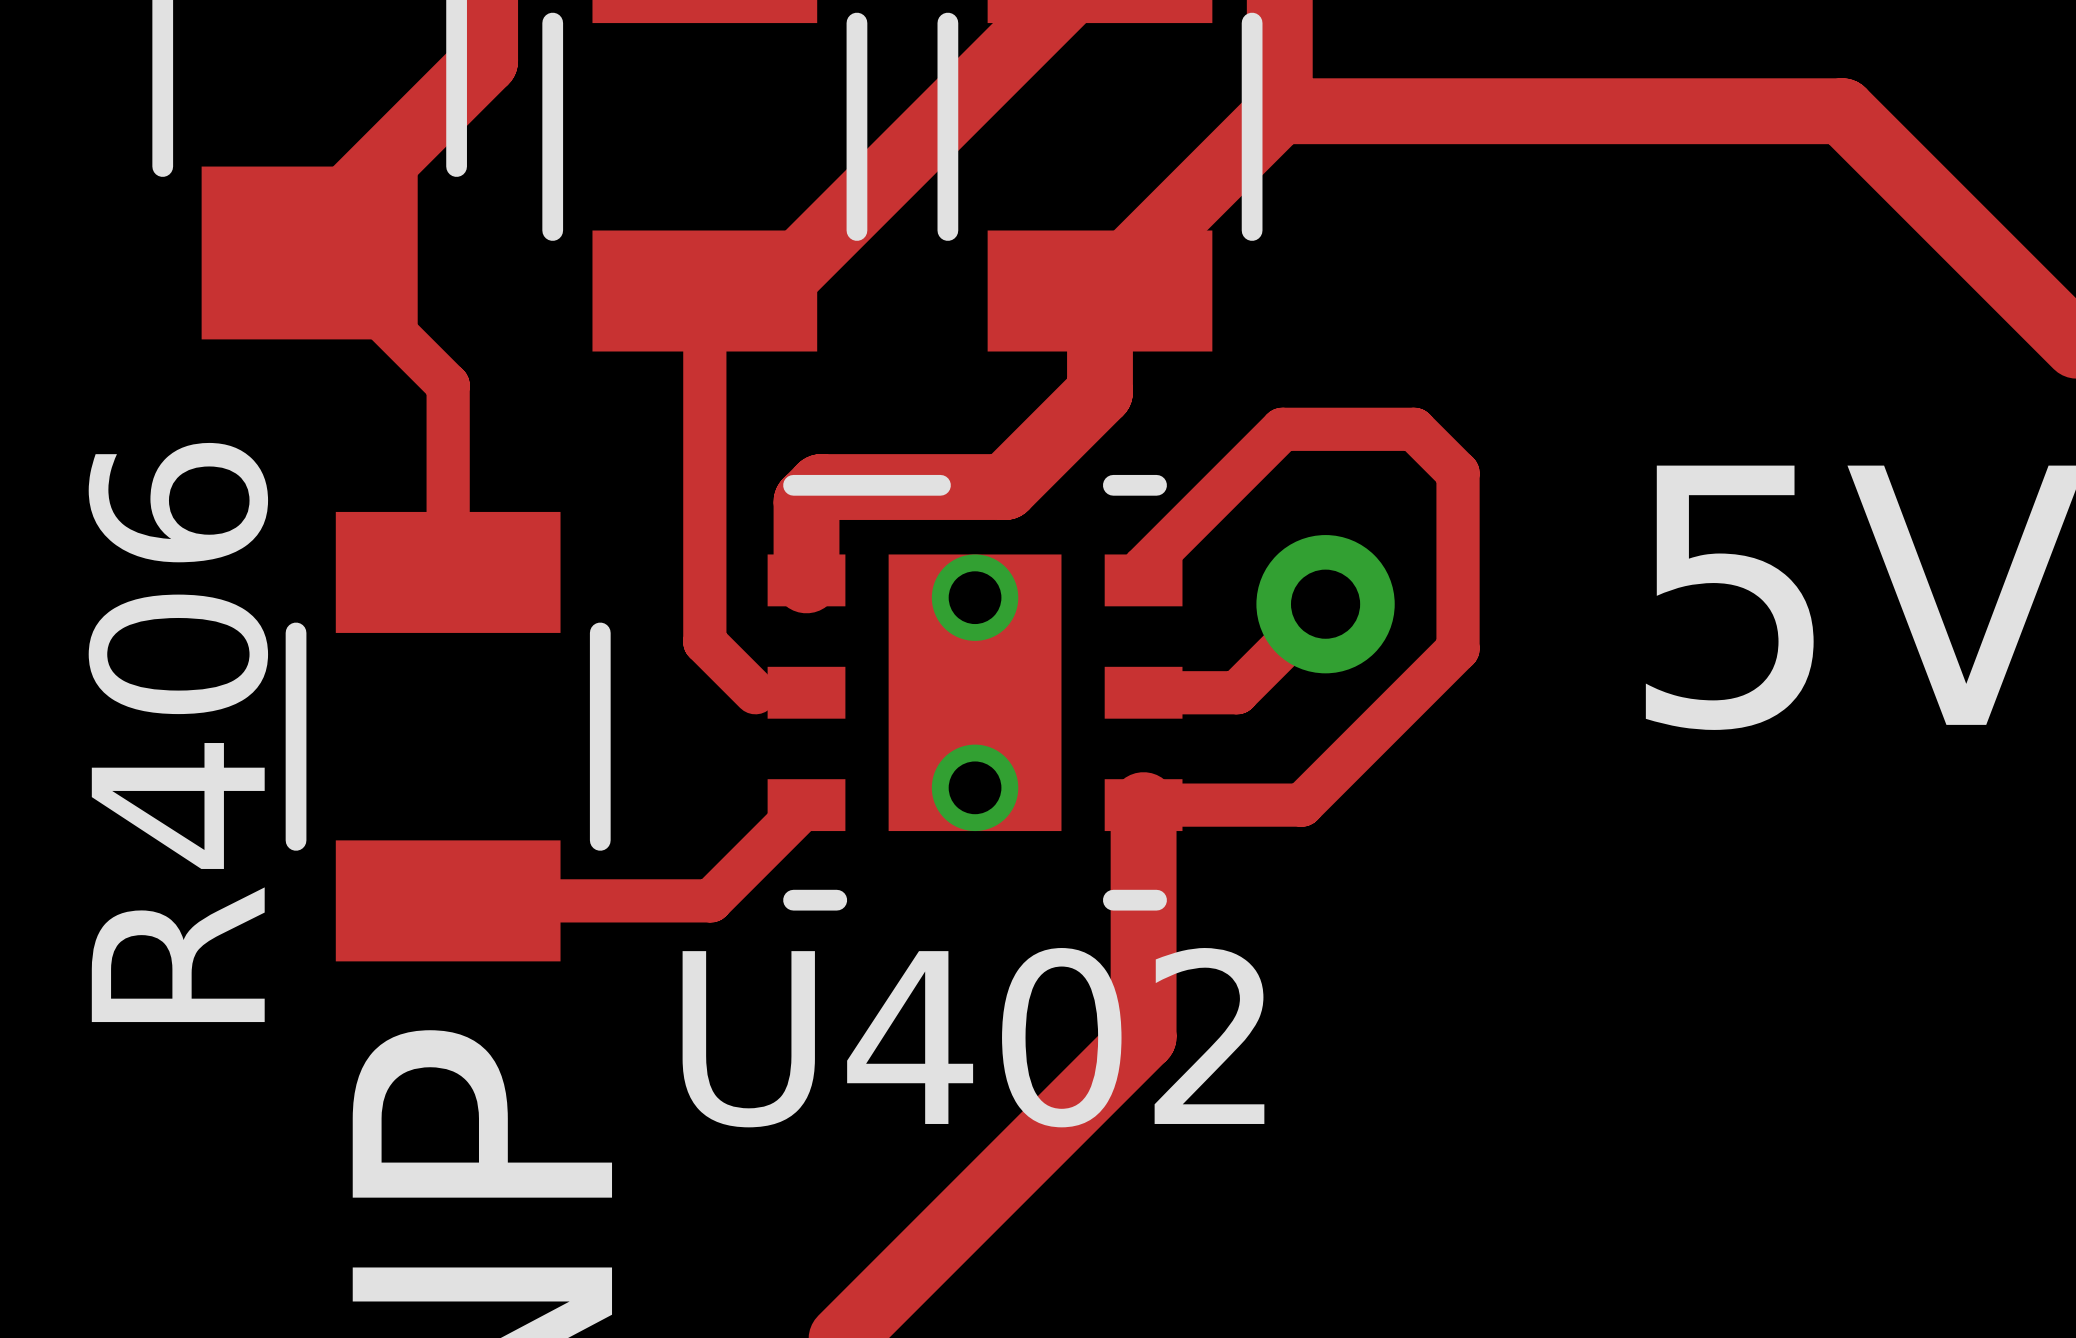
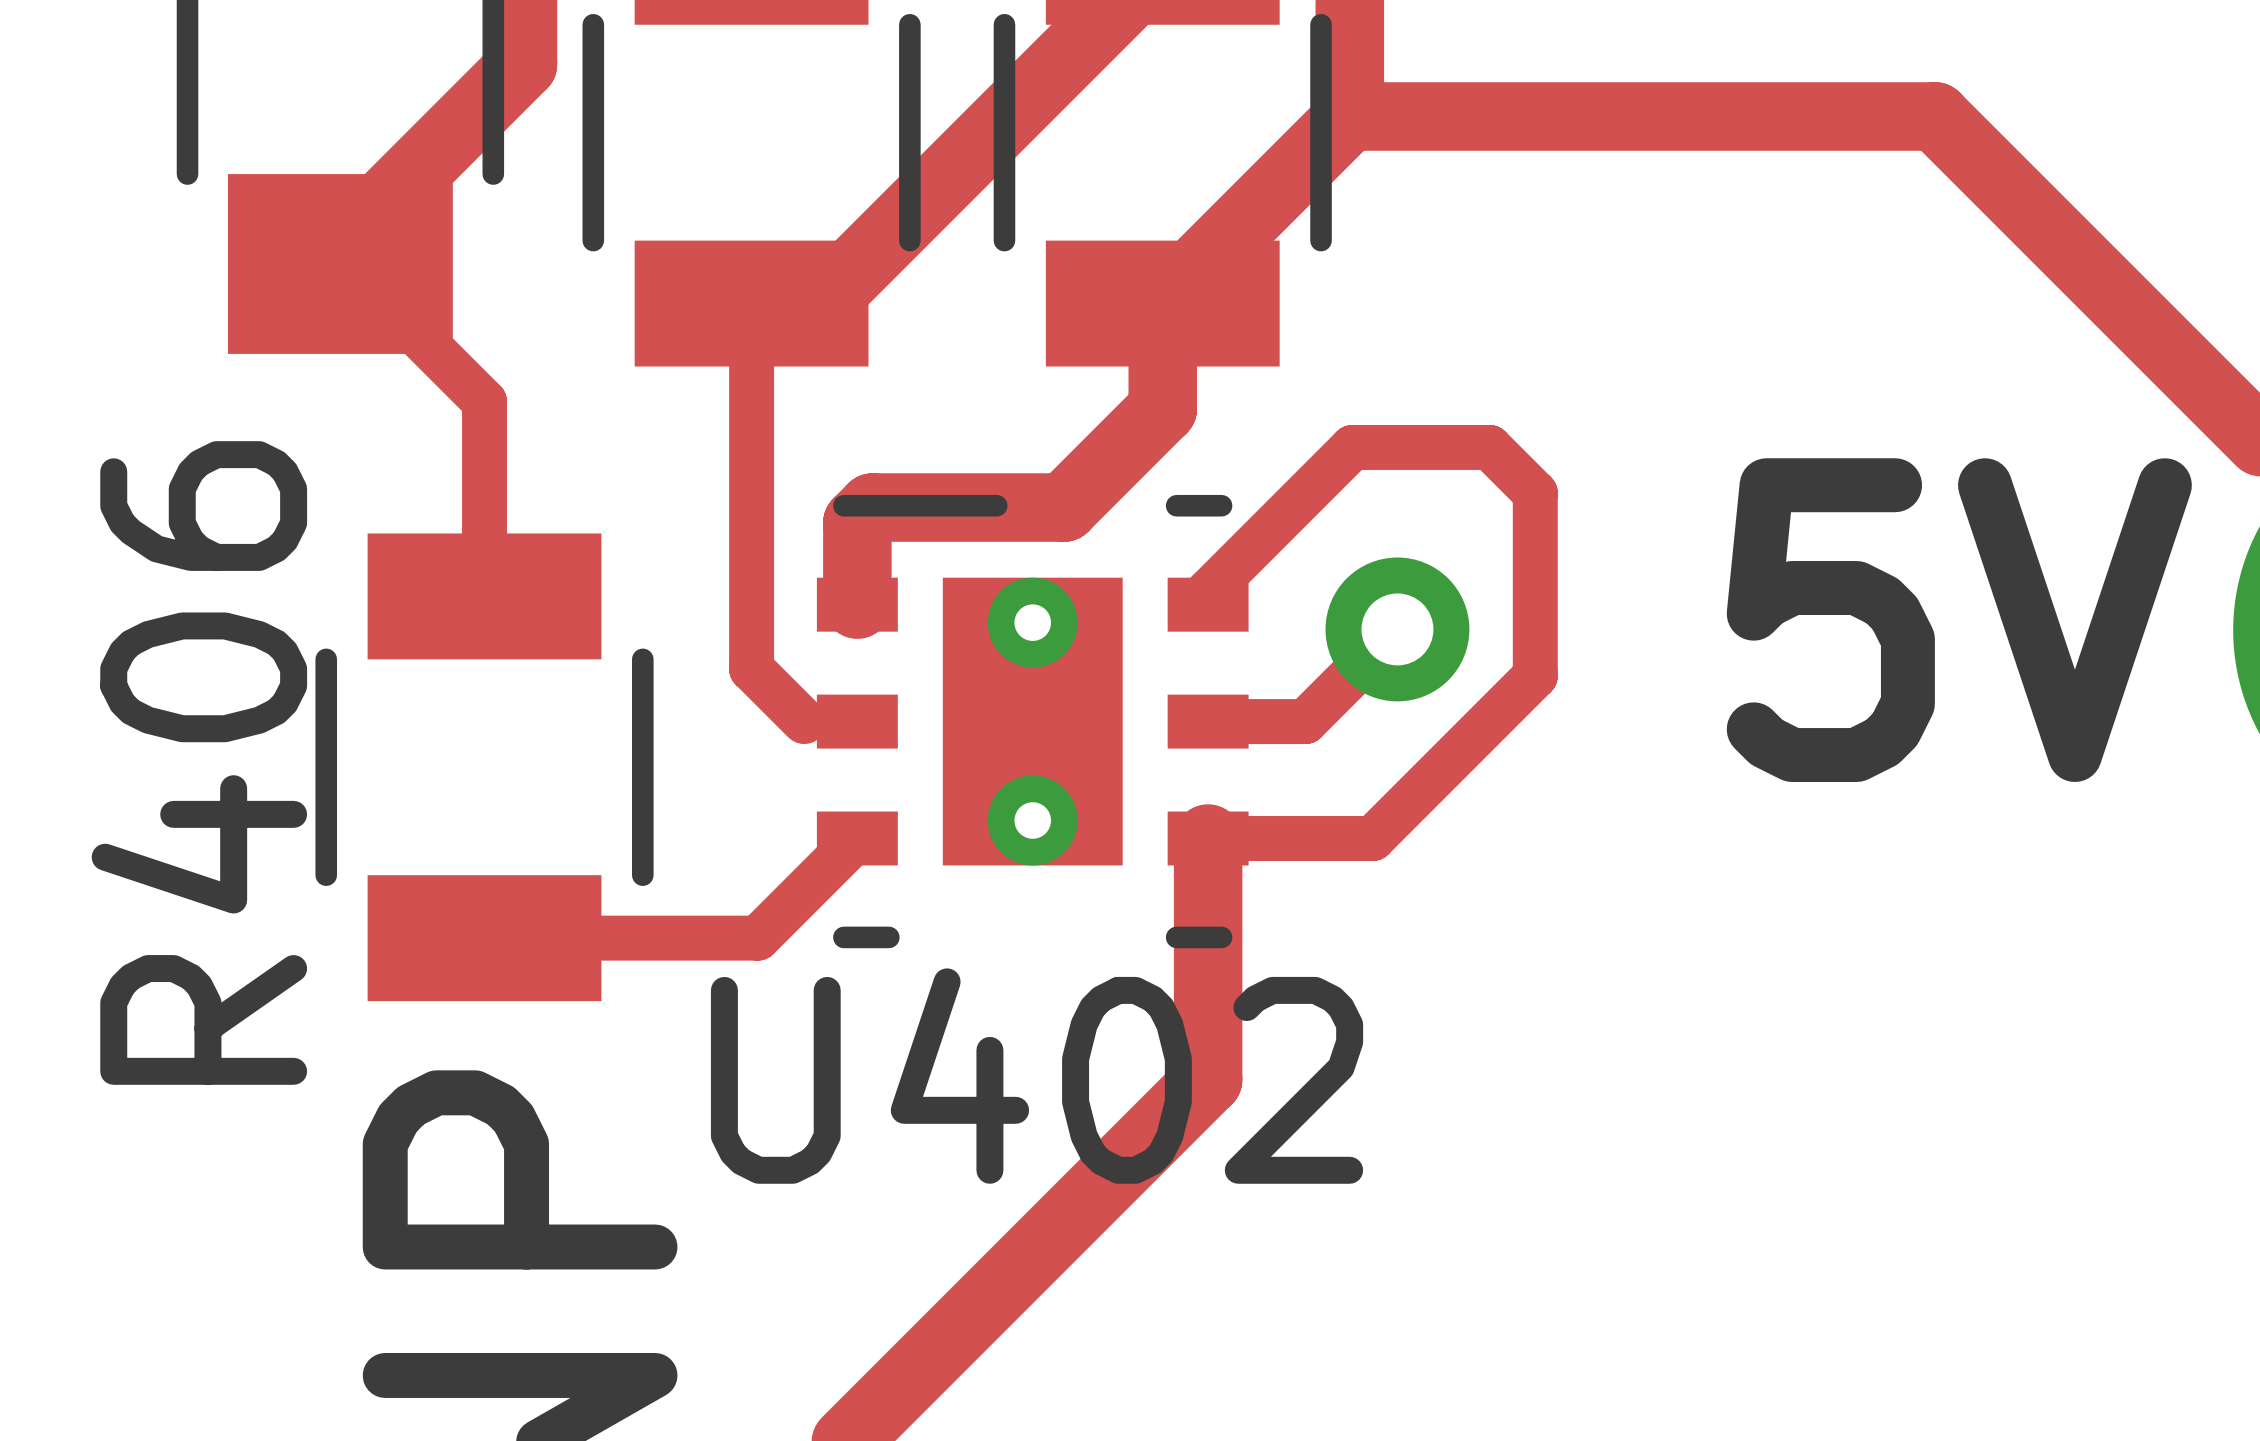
U402 footprint: [767, 474, 1183, 911] -> [816, 494, 1249, 949]

